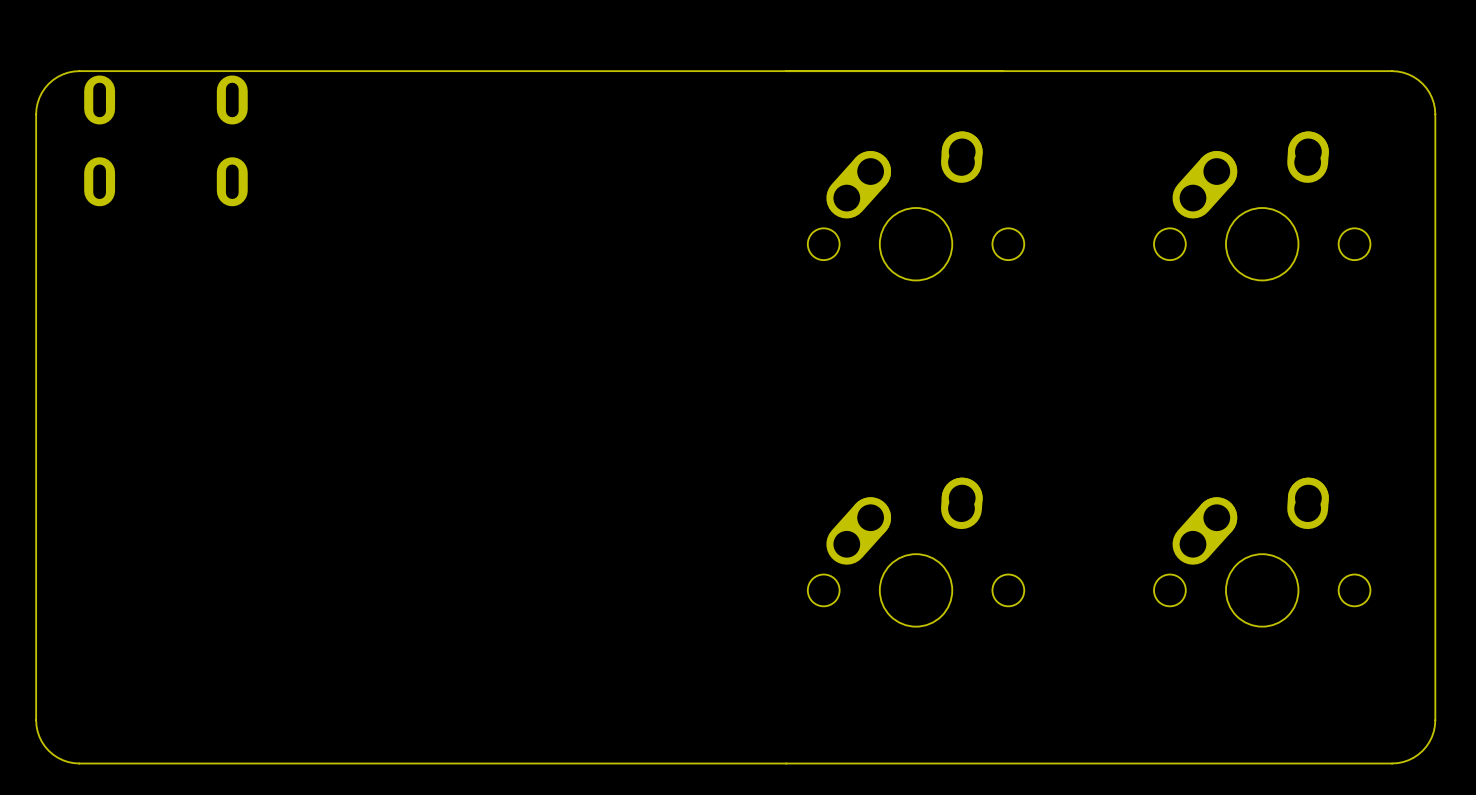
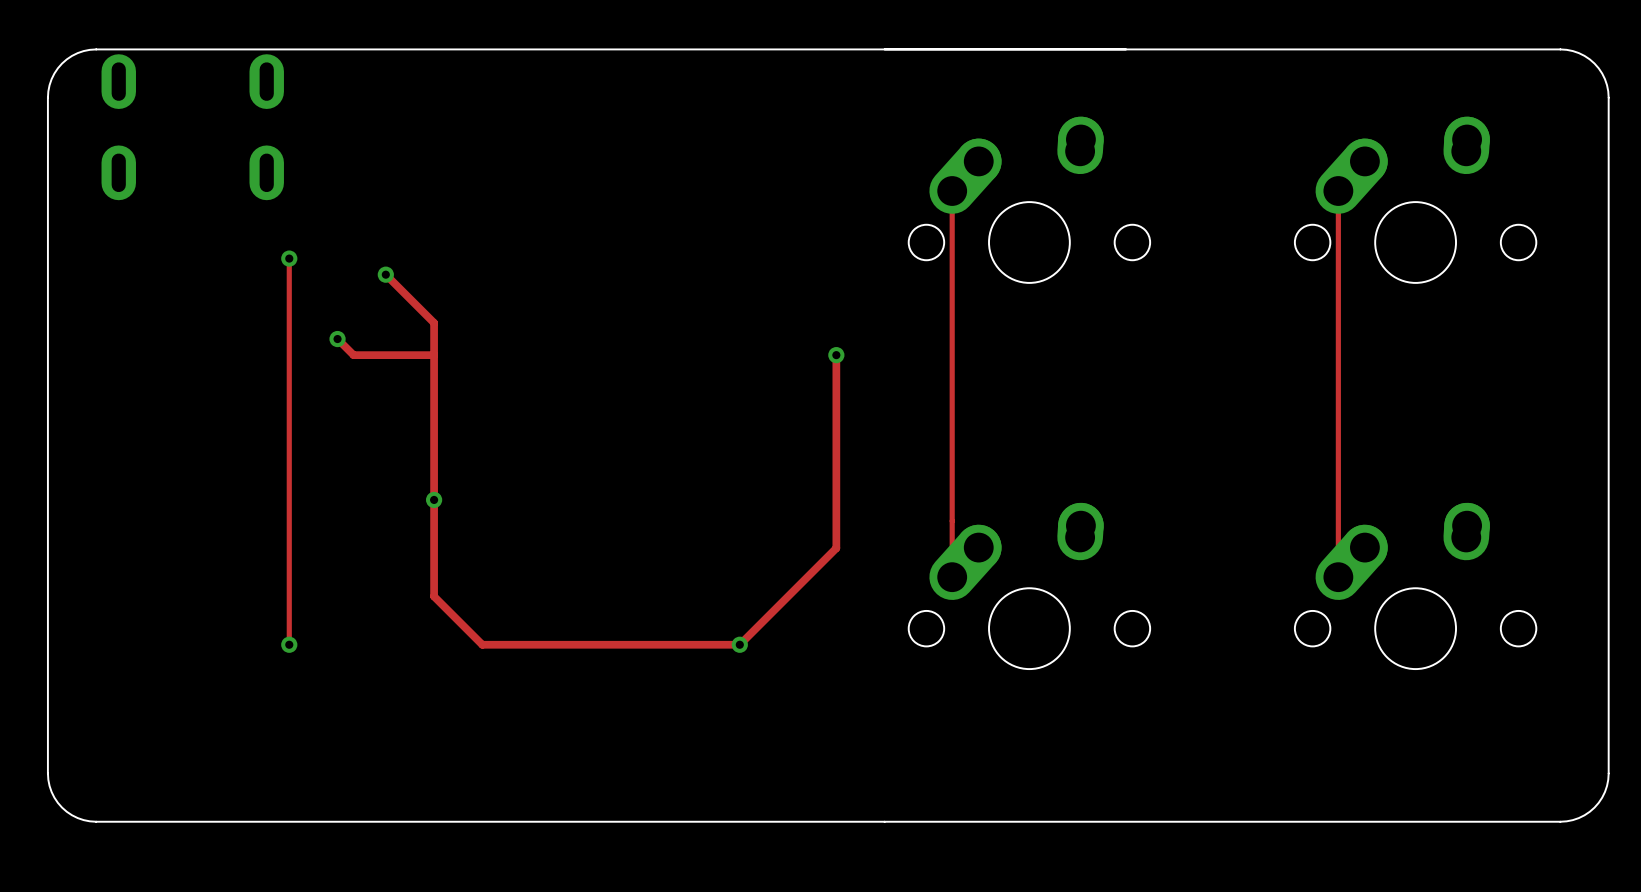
track: none -> (952, 191) (952, 577)
track: none -> (1338, 191) (1338, 577)
track: none -> (289, 258) (289, 644)
via: none -> (289, 258)
track: none -> (385, 274) (434, 322) (434, 596) (482, 644) (739, 644) (836, 548) (836, 355)
via: none -> (385, 274)
track: none -> (337, 339) (353, 355) (434, 355)
via: none -> (337, 339)
via: none -> (836, 355)
via: none -> (434, 499)
via: none -> (289, 644)
via: none -> (739, 644)

